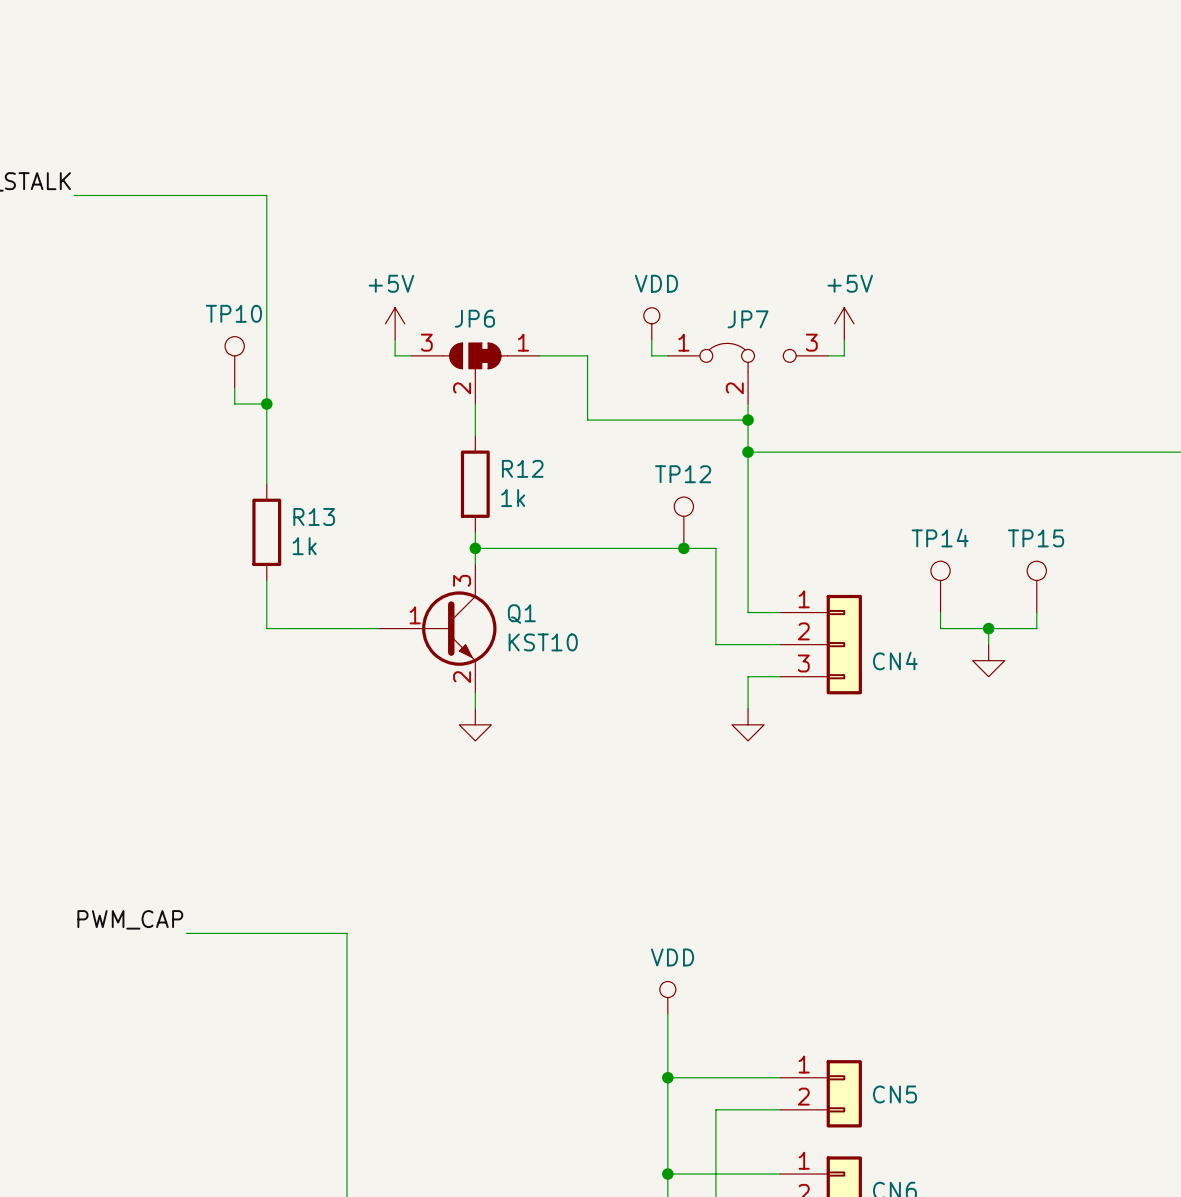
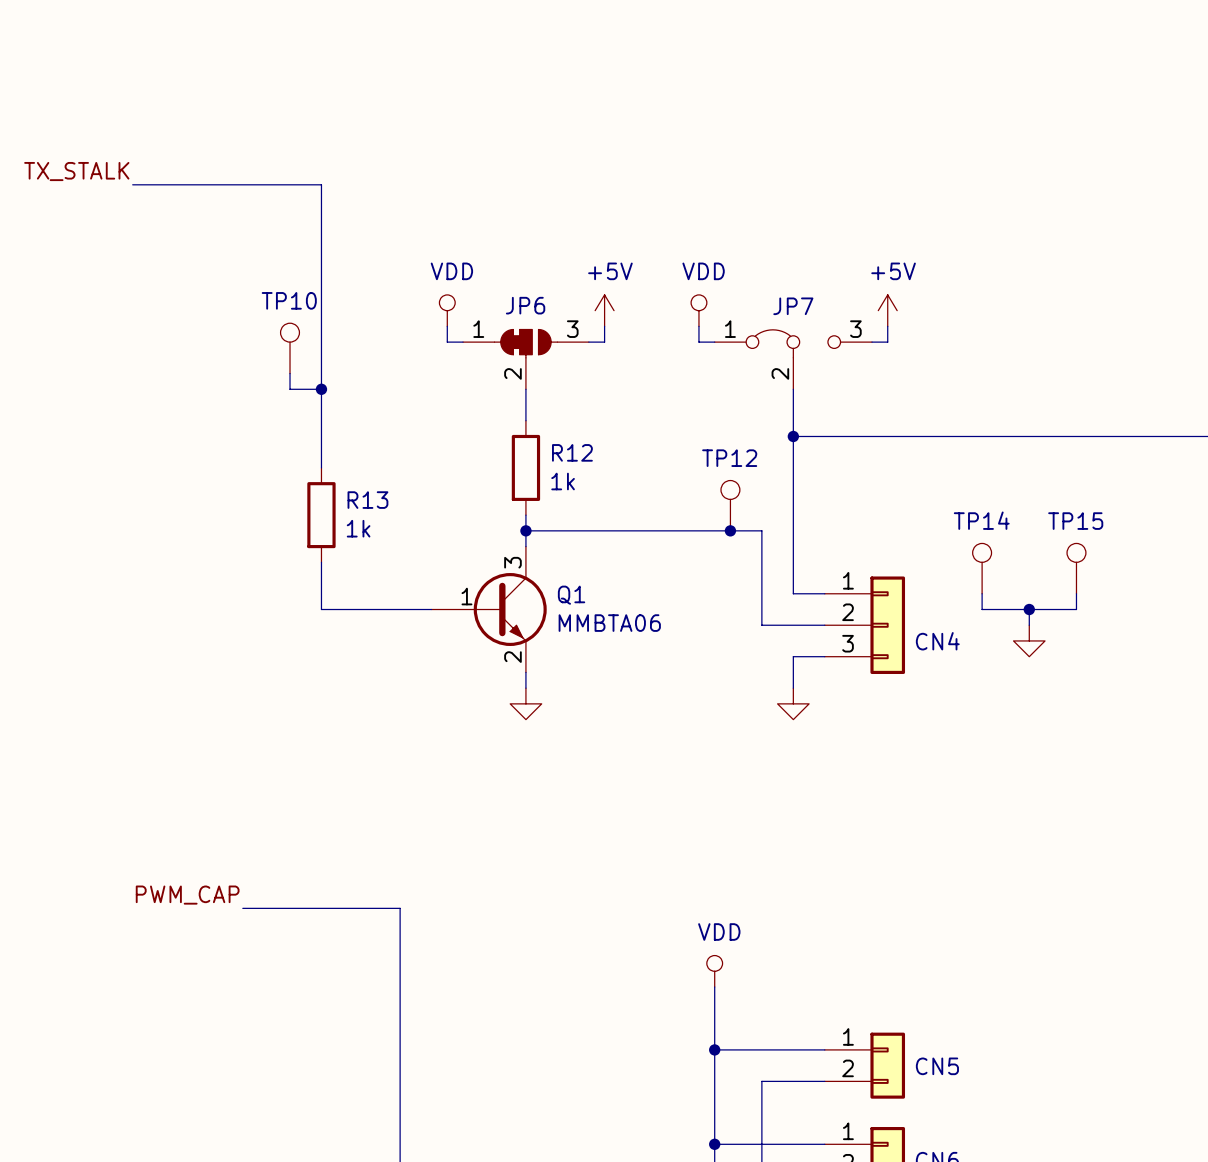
power symbol: +5V (395, 323) -> VDD (447, 310)
power symbol: none -> +5V (604, 310)
wire: (555, 355) (587, 355) (587, 420) (748, 420) -> (604, 342) (604, 326)
JP6 flip: as is (475, 357) -> left-right (525, 343)
junction: (748, 420) -> none
Q1 value: KST10 (543, 642) -> MMBTA06 (609, 623)

